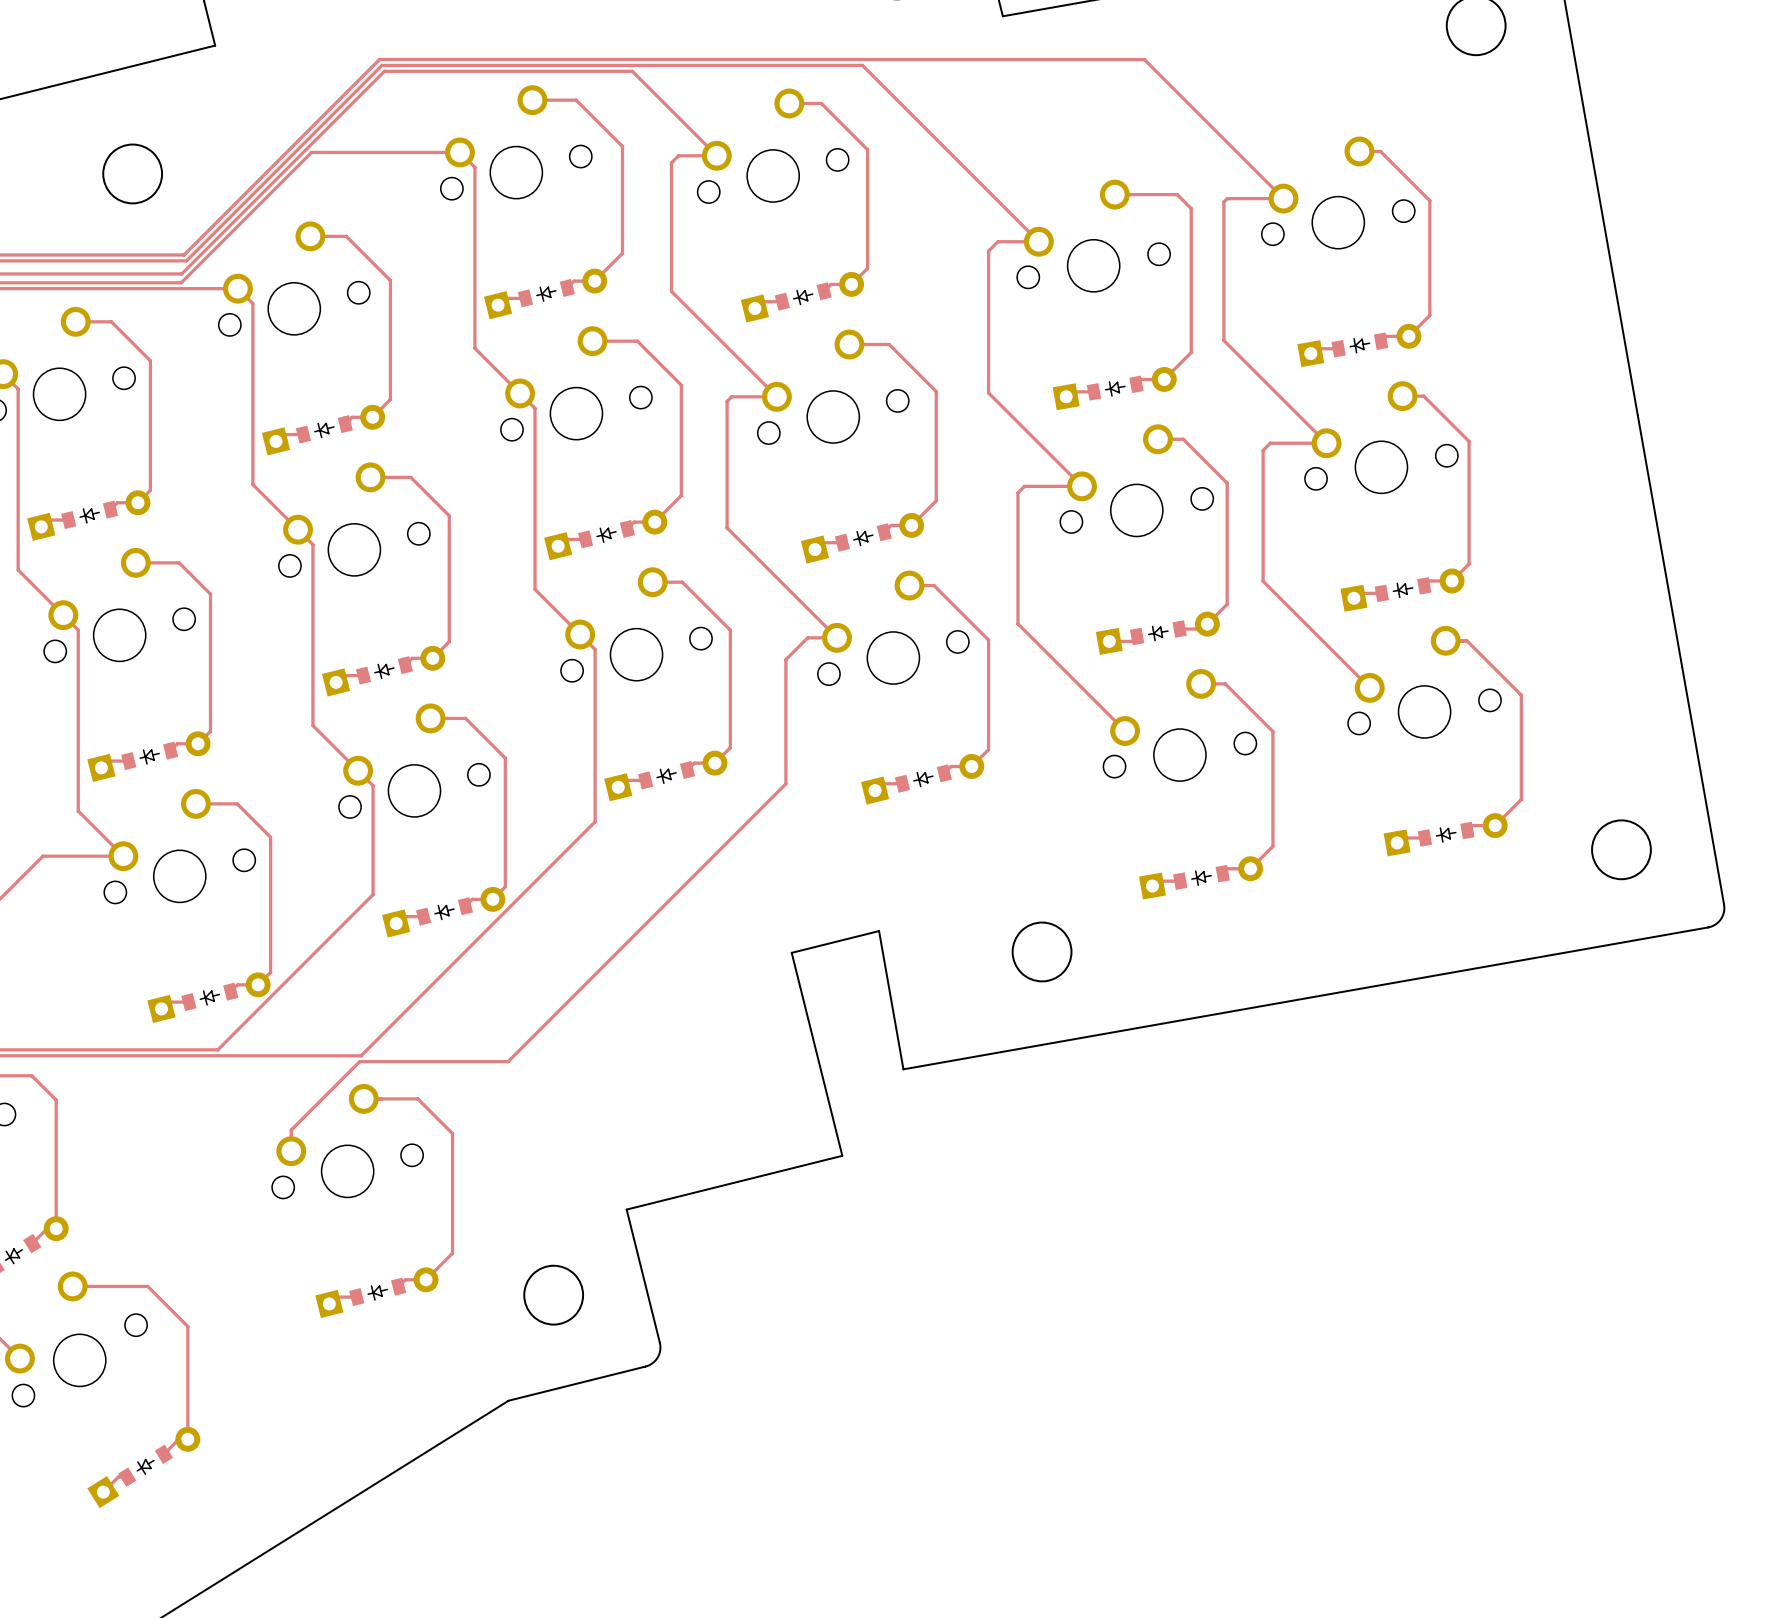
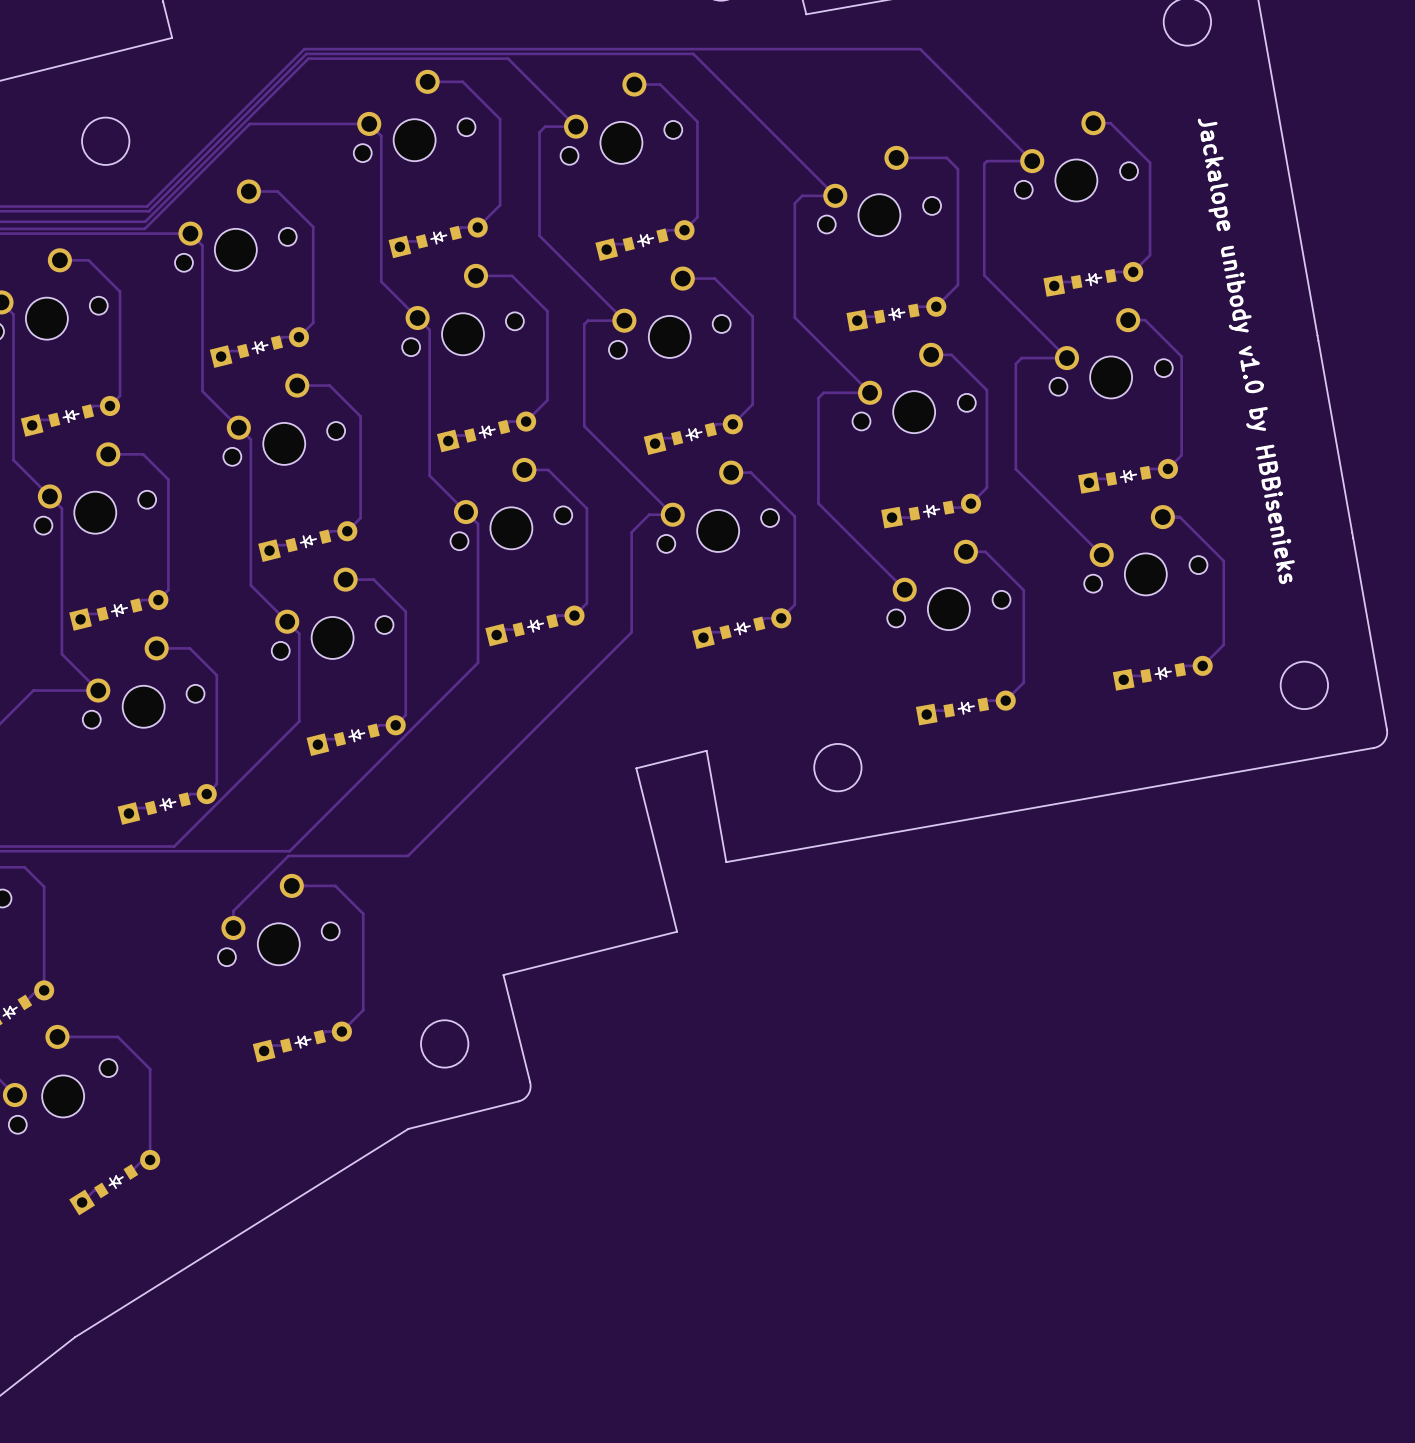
text: none -> Jackalope unibody v1.0 by HBBisenieks (1246, 351)

